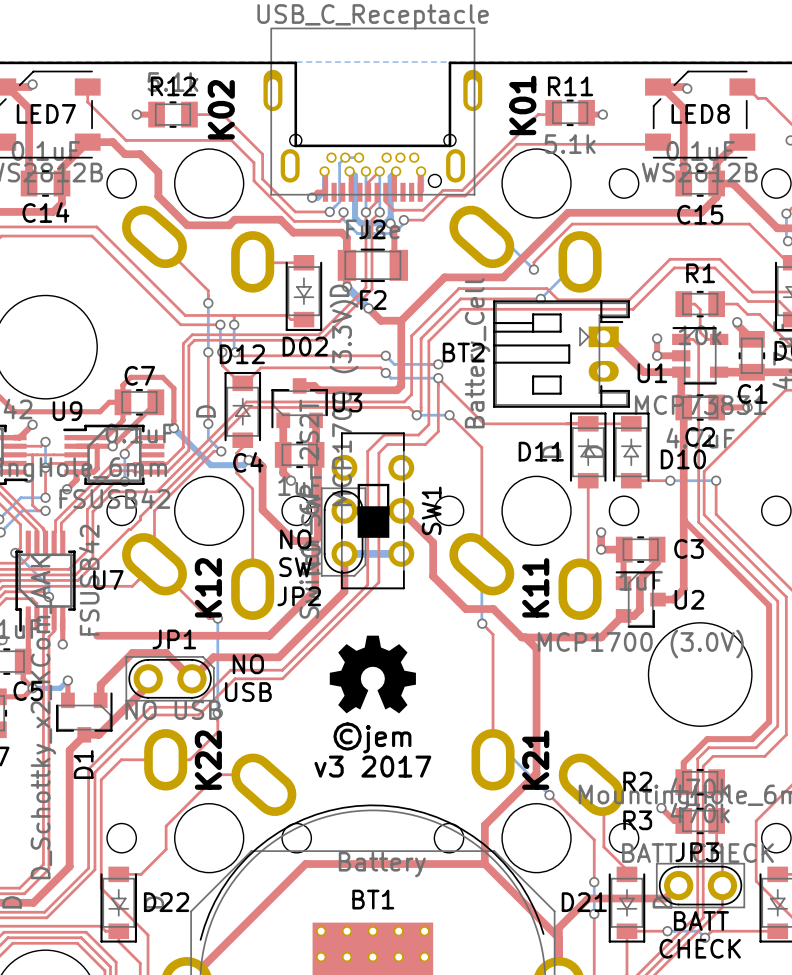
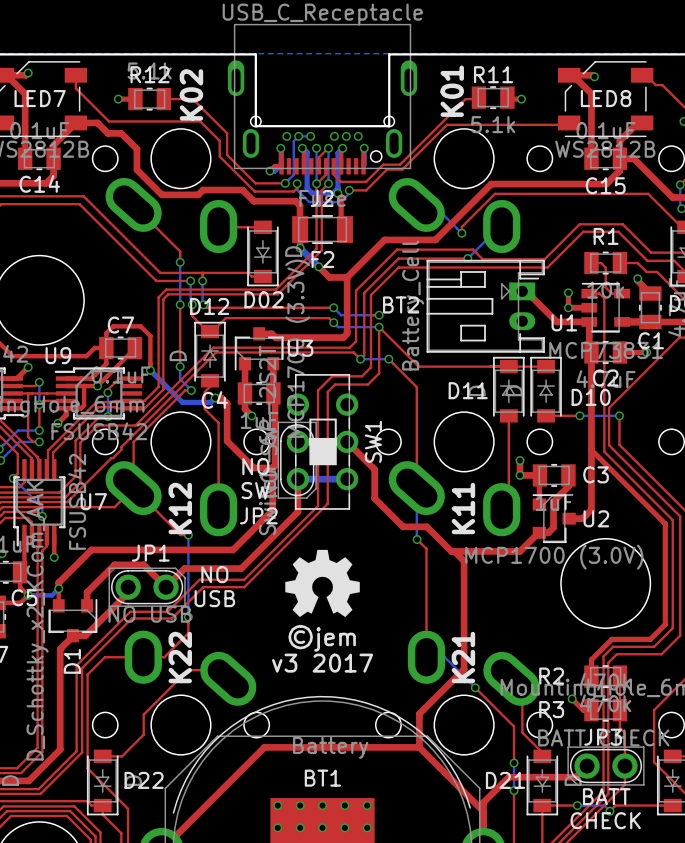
top track: (97, 635) (105, 635) -> (58, 588) (58, 582) (91, 549)

